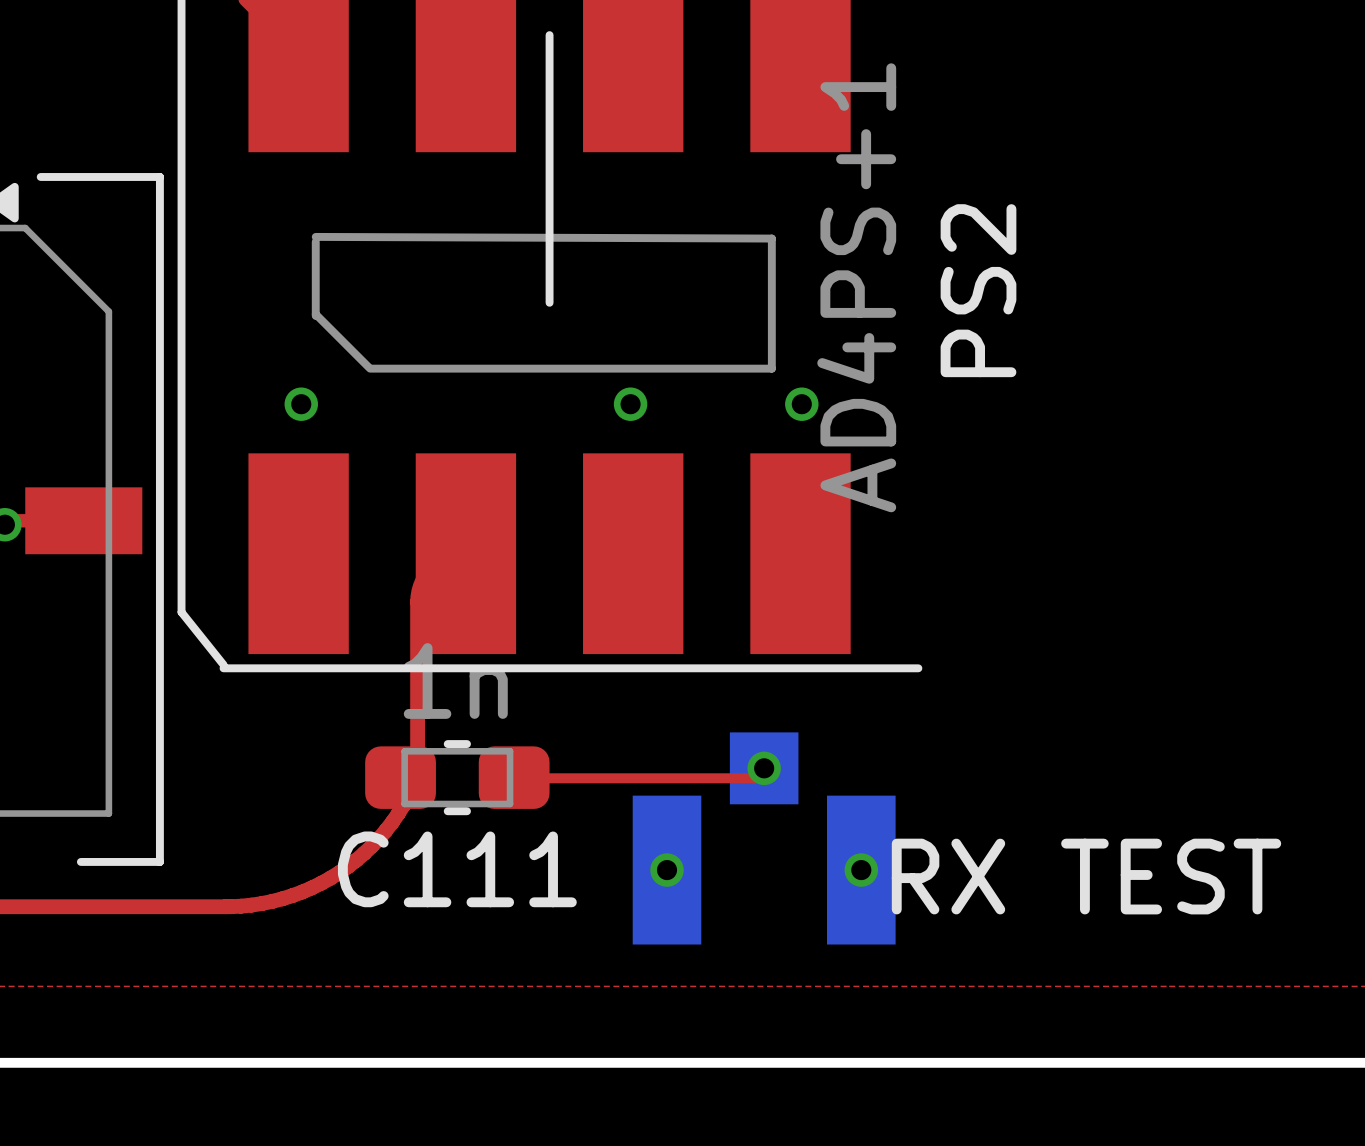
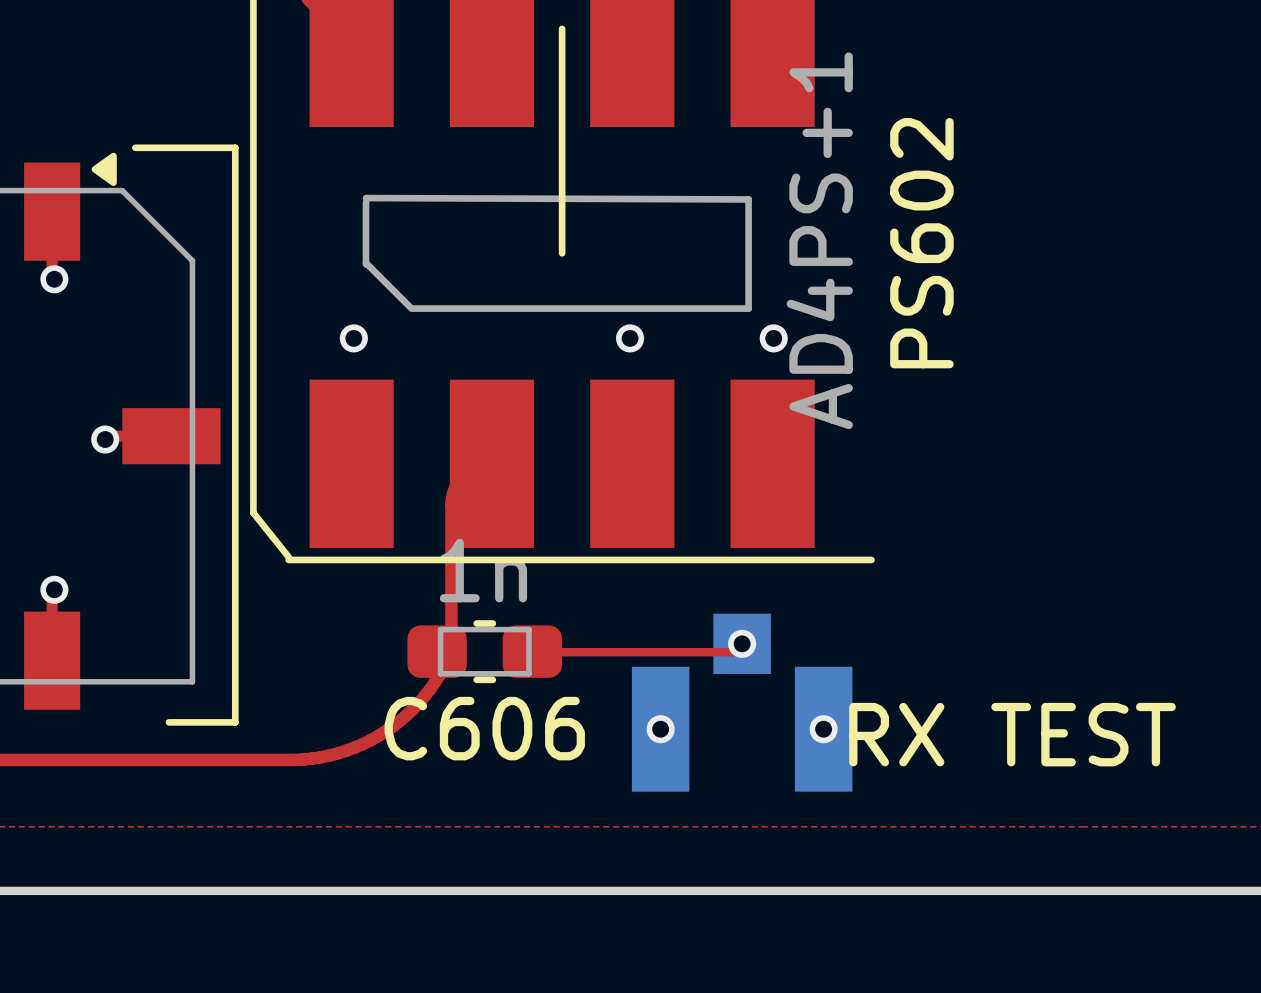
PS2 name: PS2 (978, 290) -> PS602 (921, 243)
C111 name: C111 (457, 869) -> C606 (484, 728)

